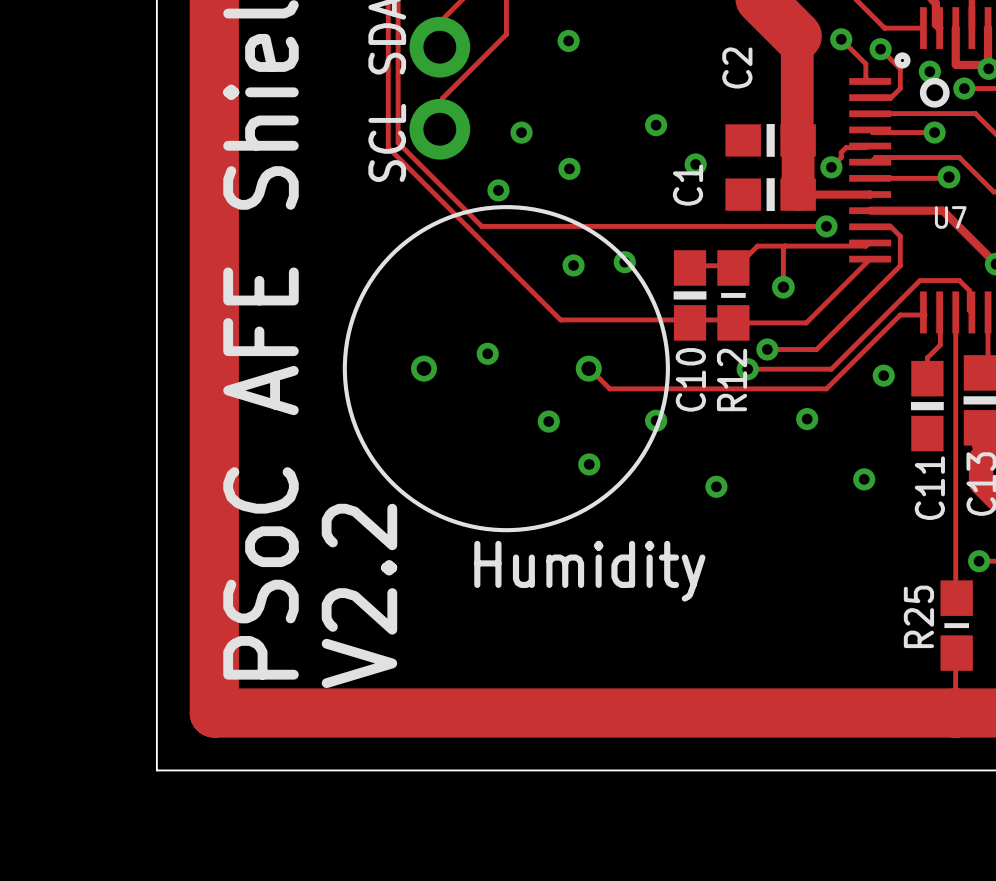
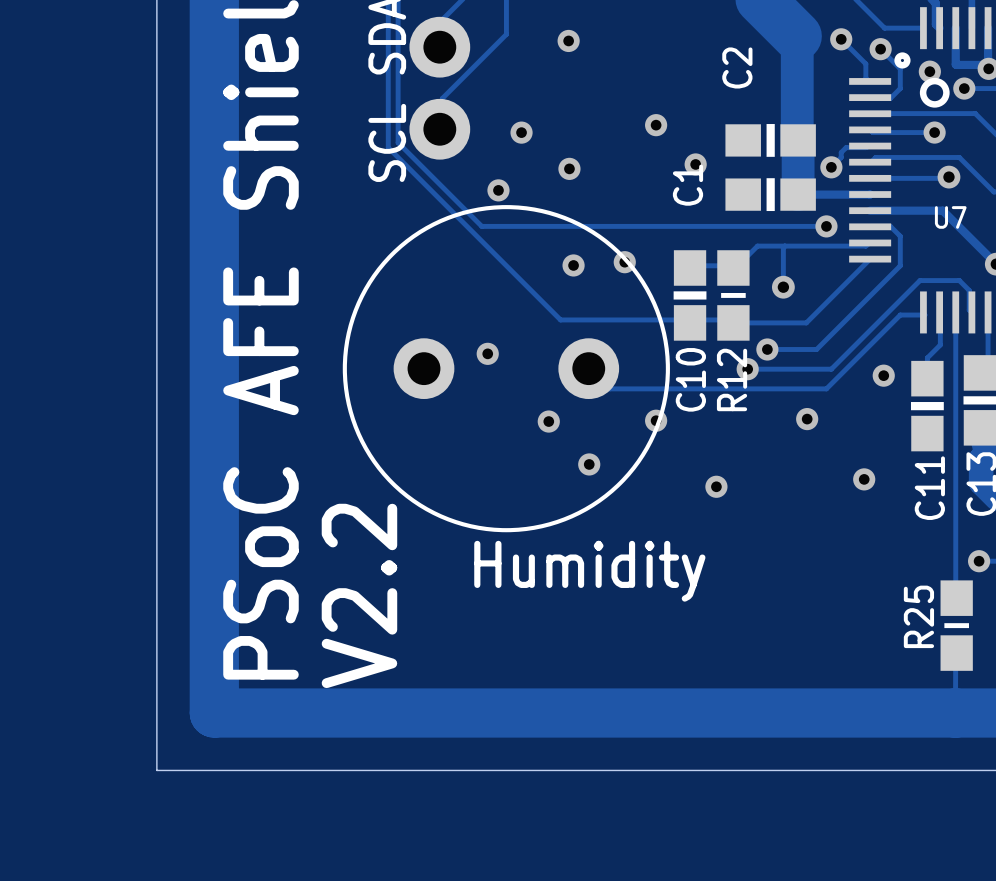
part footprint: [342, 205, 670, 533] -> [342, 205, 670, 533]

